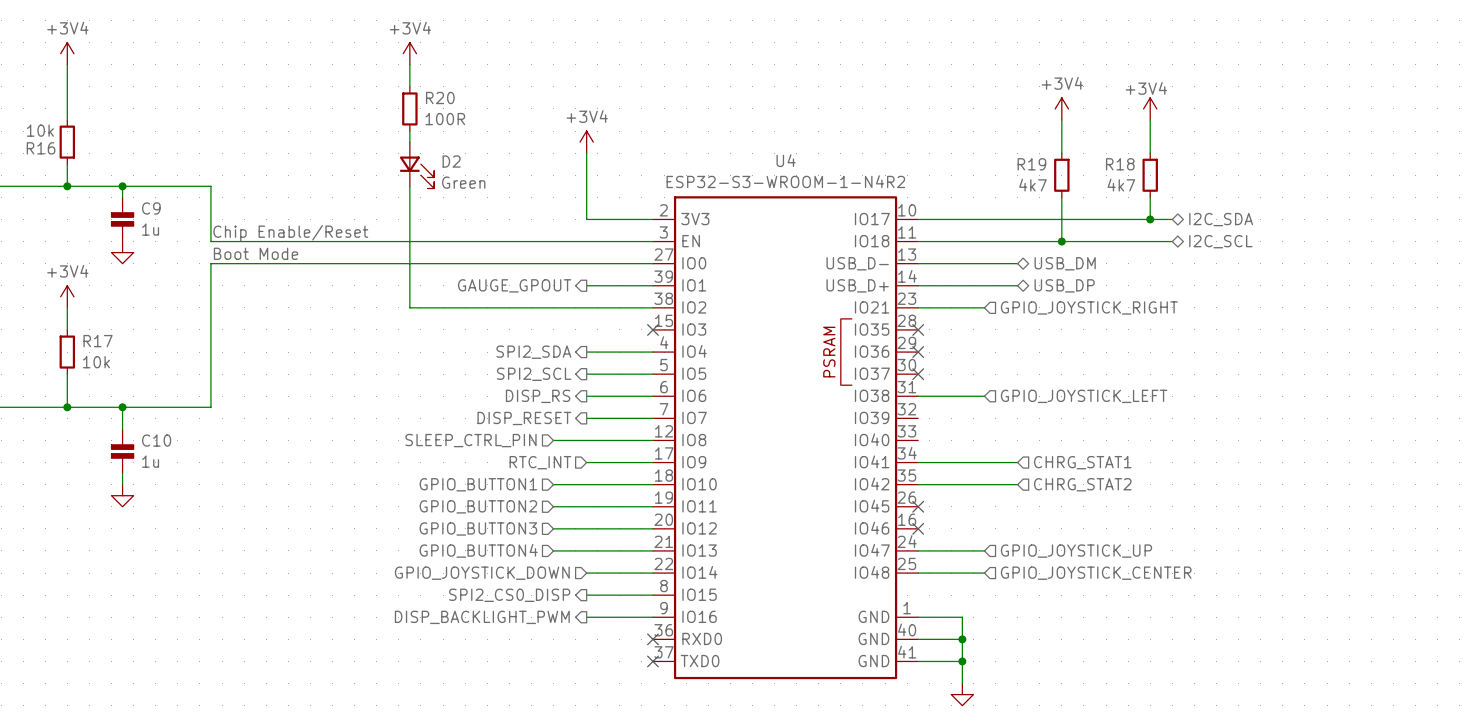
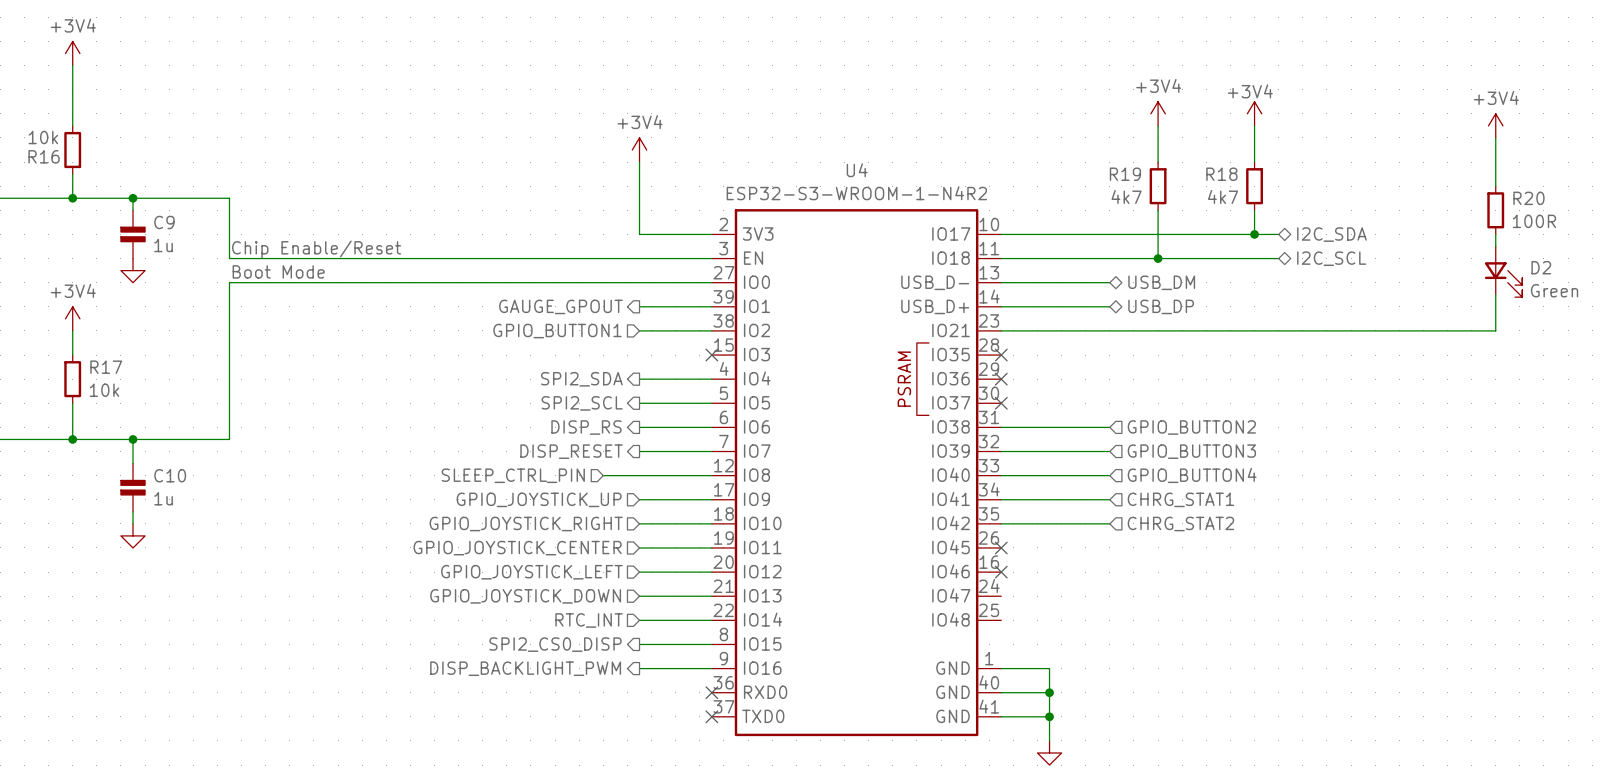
power symbol: +3V4 (409, 53) -> none
wire: (409, 64) (409, 86) -> none
R20 position: (409, 108) -> (1495, 210)
power symbol: none -> +3V4 (1495, 125)
wire: (409, 131) (409, 142) -> none
wire: none -> (1495, 137) (1495, 186)
D2 position: (417, 165) -> (1503, 271)
wire: (409, 186) (409, 307) (586, 307) -> none
wire: none -> (1495, 234) (1495, 246)
wire: none -> (1495, 294) (1495, 330) (1073, 330)
hierarchical label: GPIO_JOYSTICK_RIGHT (1089, 307) -> none
wire: none -> (1073, 427) (1109, 427)
hierarchical label: GPIO_JOYSTICK_LEFT (1084, 396) -> none
hierarchical label: none -> GPIO_BUTTON2 (1191, 427)
wire: none -> (1001, 451) (1109, 451)
hierarchical label: none -> GPIO_BUTTON3 (1191, 451)
wire: none -> (1001, 475) (1109, 475)
hierarchical label: none -> GPIO_BUTTON4 (1192, 475)
hierarchical label: RTC_INT (540, 462) -> GPIO_JOYSTICK_UP (539, 499)
hierarchical label position: GPIO_BUTTON1 (478, 484) -> GPIO_BUTTON1 (557, 331)
hierarchical label: none -> GPIO_JOYSTICK_RIGHT (526, 523)
wire: (553, 484) (586, 484) -> none
hierarchical label: none -> GPIO_JOYSTICK_CENTER (517, 548)
hierarchical label: GPIO_BUTTON2 (478, 506) -> none
wire: (553, 506) (586, 506) -> none
hierarchical label: GPIO_BUTTON3 (478, 528) -> none
hierarchical label: none -> GPIO_JOYSTICK_LEFT (531, 572)
wire: (553, 528) (586, 528) -> none
hierarchical label: GPIO_BUTTON4 (478, 550) -> none
wire: (553, 550) (586, 550) -> none
wire: (918, 550) (984, 550) -> none
hierarchical label: none -> GPIO_JOYSTICK_DOWN (525, 596)
hierarchical label: GPIO_JOYSTICK_UP (1076, 551) -> none
hierarchical label: GPIO_JOYSTICK_DOWN (482, 573) -> RTC_INT (589, 620)
wire: (918, 573) (984, 573) -> none
hierarchical label: GPIO_JOYSTICK_CENTER (1096, 573) -> none

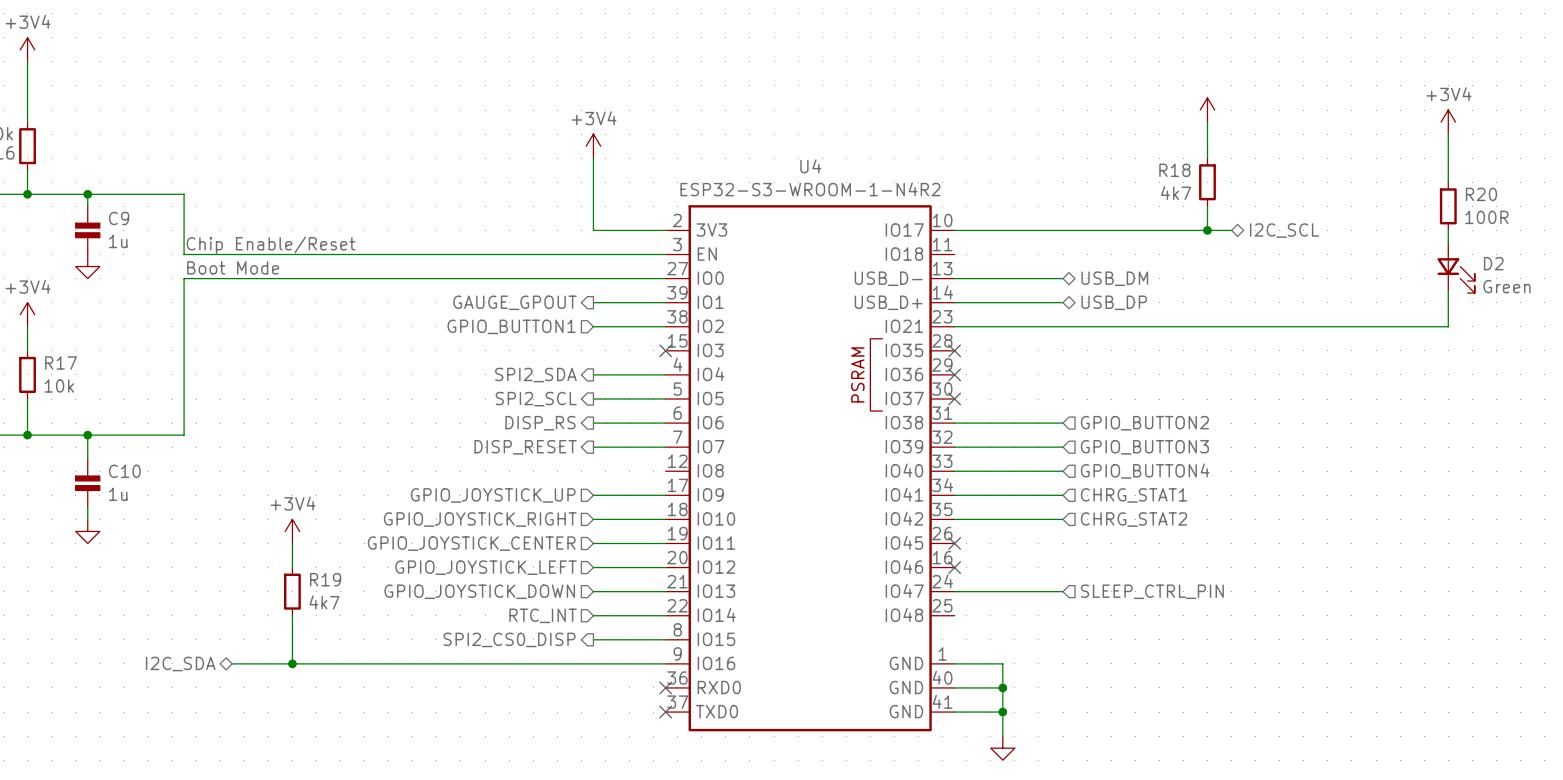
power symbol text: +3V4 (1250, 91) -> none
power symbol: +3V4 (1158, 113) -> none
wire: (1158, 125) (1158, 162) -> none
R19 name position: R19 (1125, 174) -> R19 (325, 579)
R19 position: (1158, 186) -> (292, 591)
R19 value position: 4k7 (1126, 196) -> 4k7 (324, 602)
wire: (1158, 210) (1158, 258) -> none
hierarchical label: I2C_SDA (1331, 234) -> I2C_SCL (1284, 230)
wire: (1001, 258) (1278, 258) -> none
junction: (1158, 258) -> none
hierarchical label: I2C_SCL (1331, 258) -> none
hierarchical label: SLEEP_CTRL_PIN (513, 475) -> none
wire: (603, 475) (711, 475) -> none
power symbol: none -> +3V4 (292, 531)
wire: none -> (292, 543) (292, 567)
wire: none -> (954, 591) (1063, 591)
hierarchical label: none -> SLEEP_CTRL_PIN (1152, 591)
wire: none -> (292, 615) (292, 663)
hierarchical label: none -> I2C_SDA (180, 664)
wire: none -> (232, 663) (593, 663)
junction: none -> (292, 663)
hierarchical label: DISP_BACKLIGHT_PWM (525, 668) -> none

